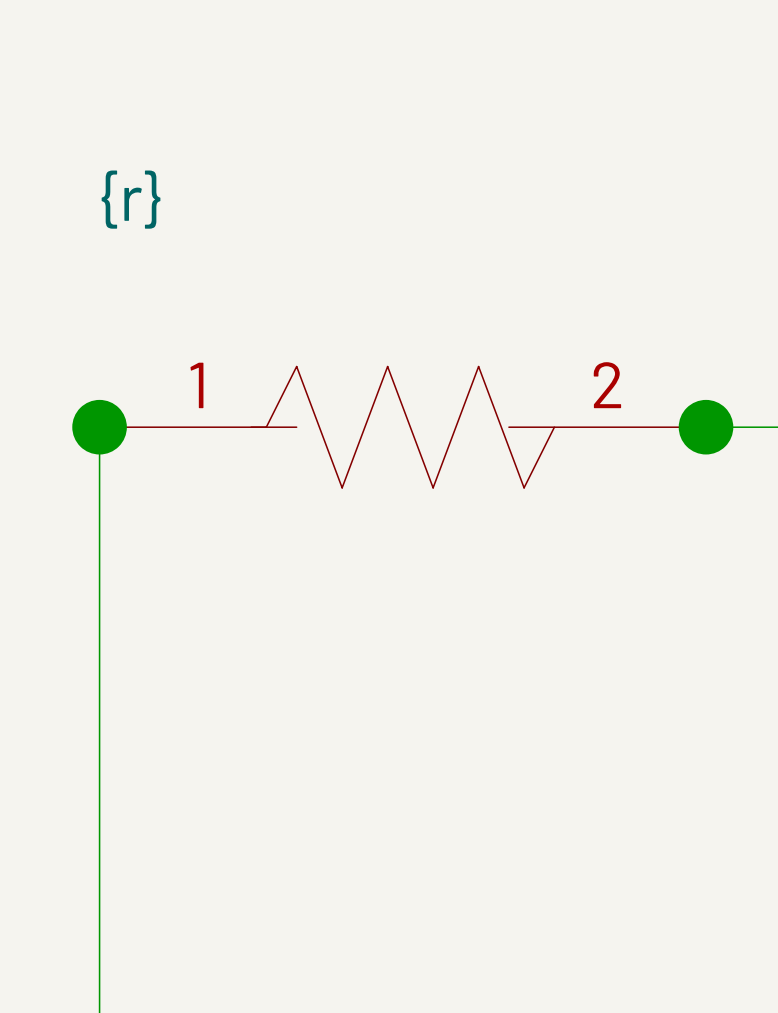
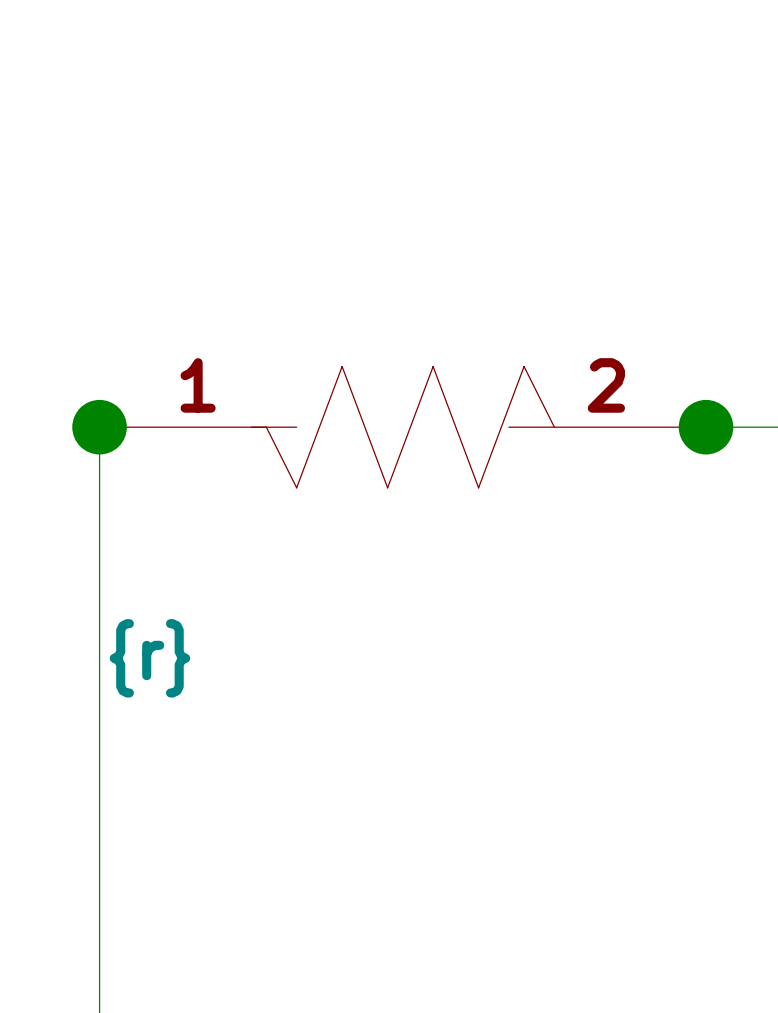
part flip: as is (402, 427) -> up-down (402, 427)

